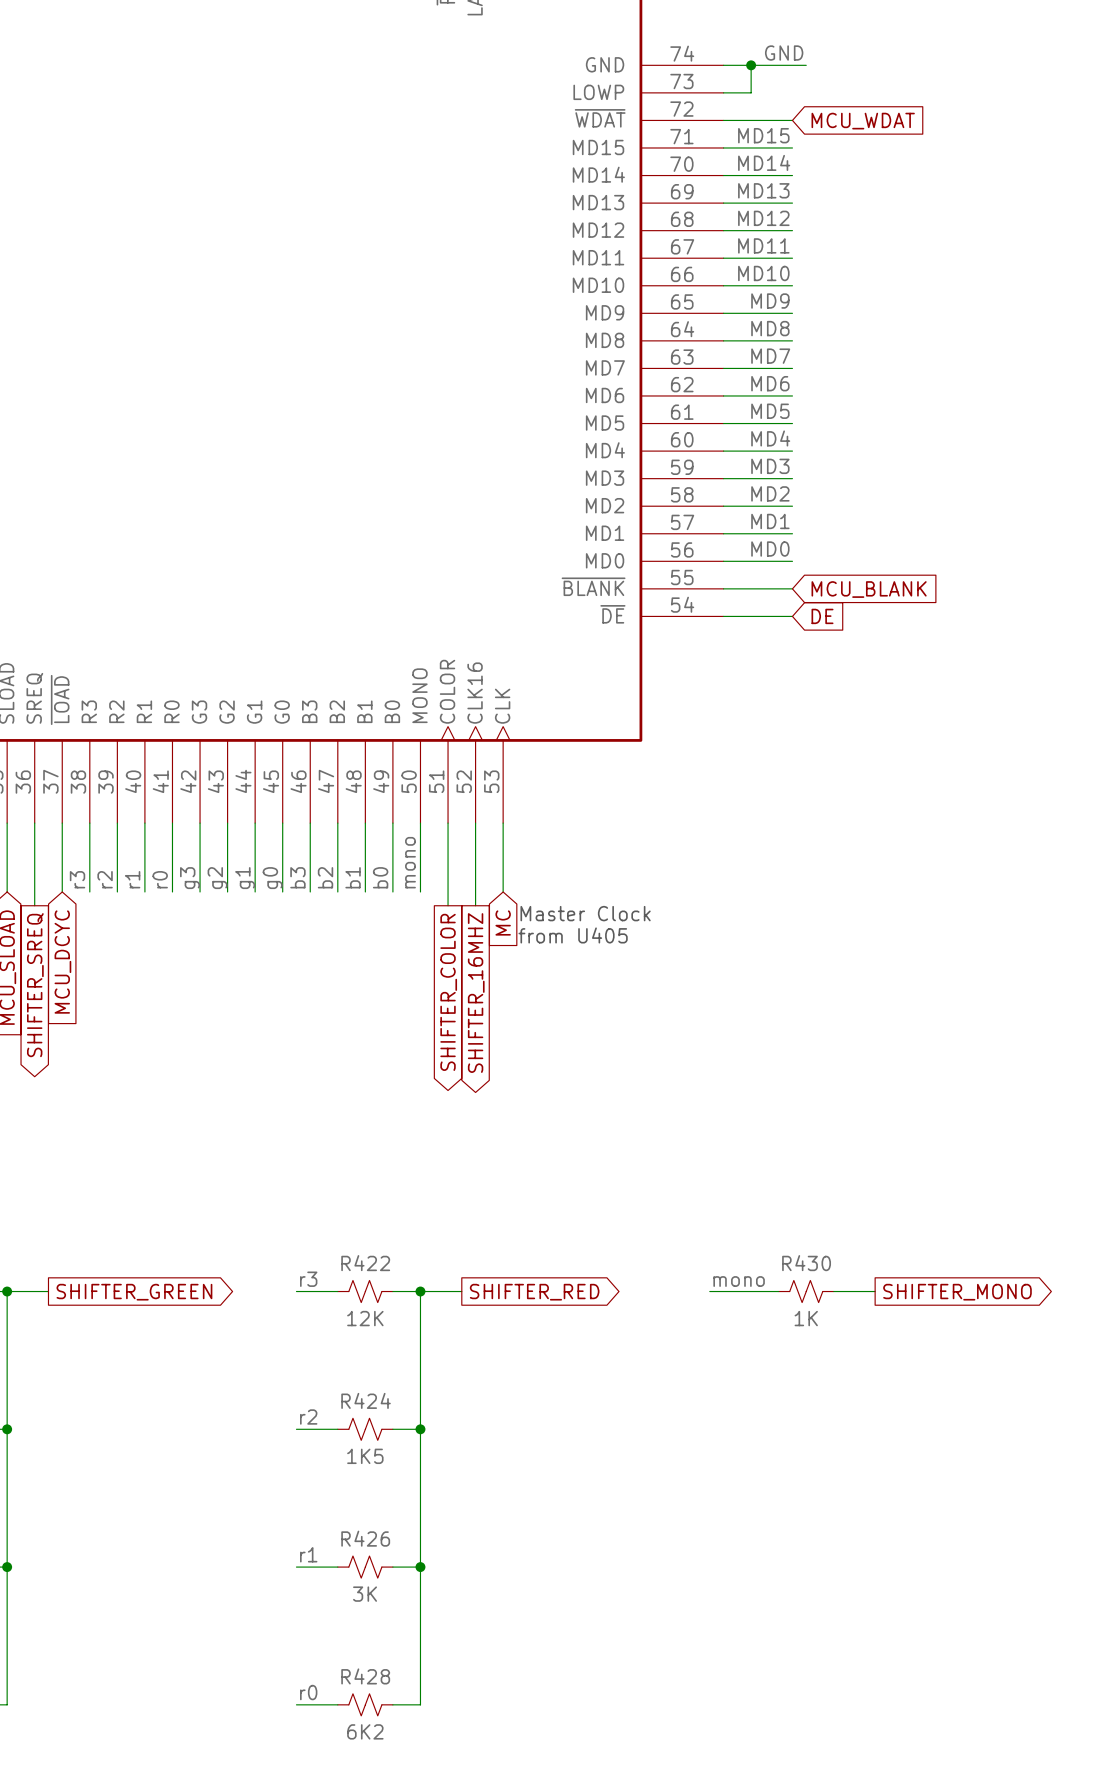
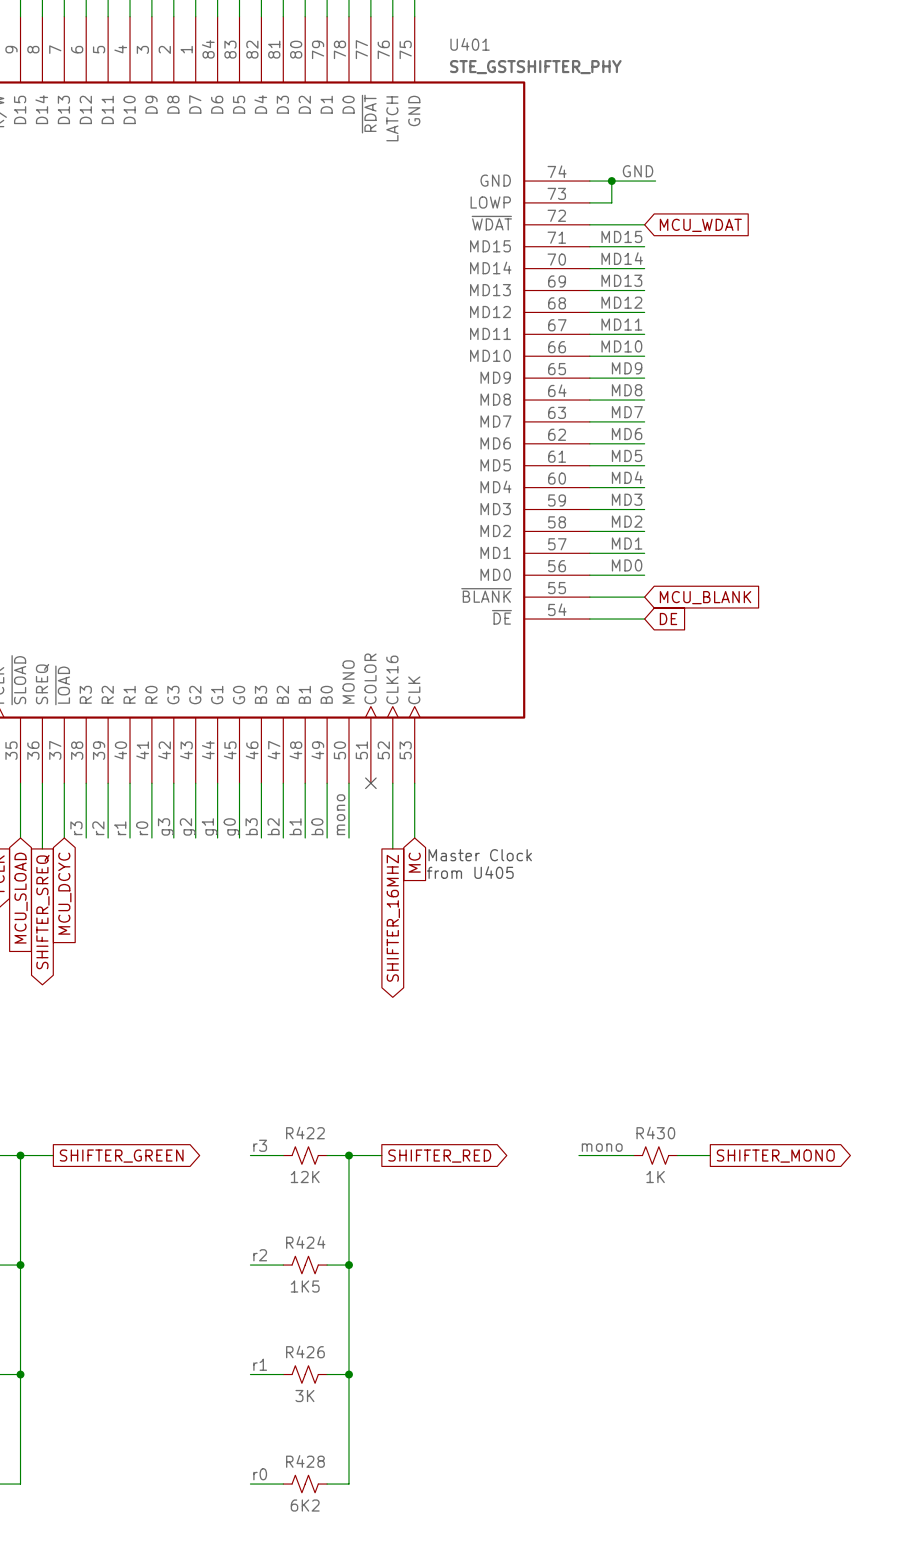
wire: (448, 823) (448, 905) -> none
no-connect mark: none -> (370, 783)
global label: SHIFTER_COLOR (448, 992) -> none

